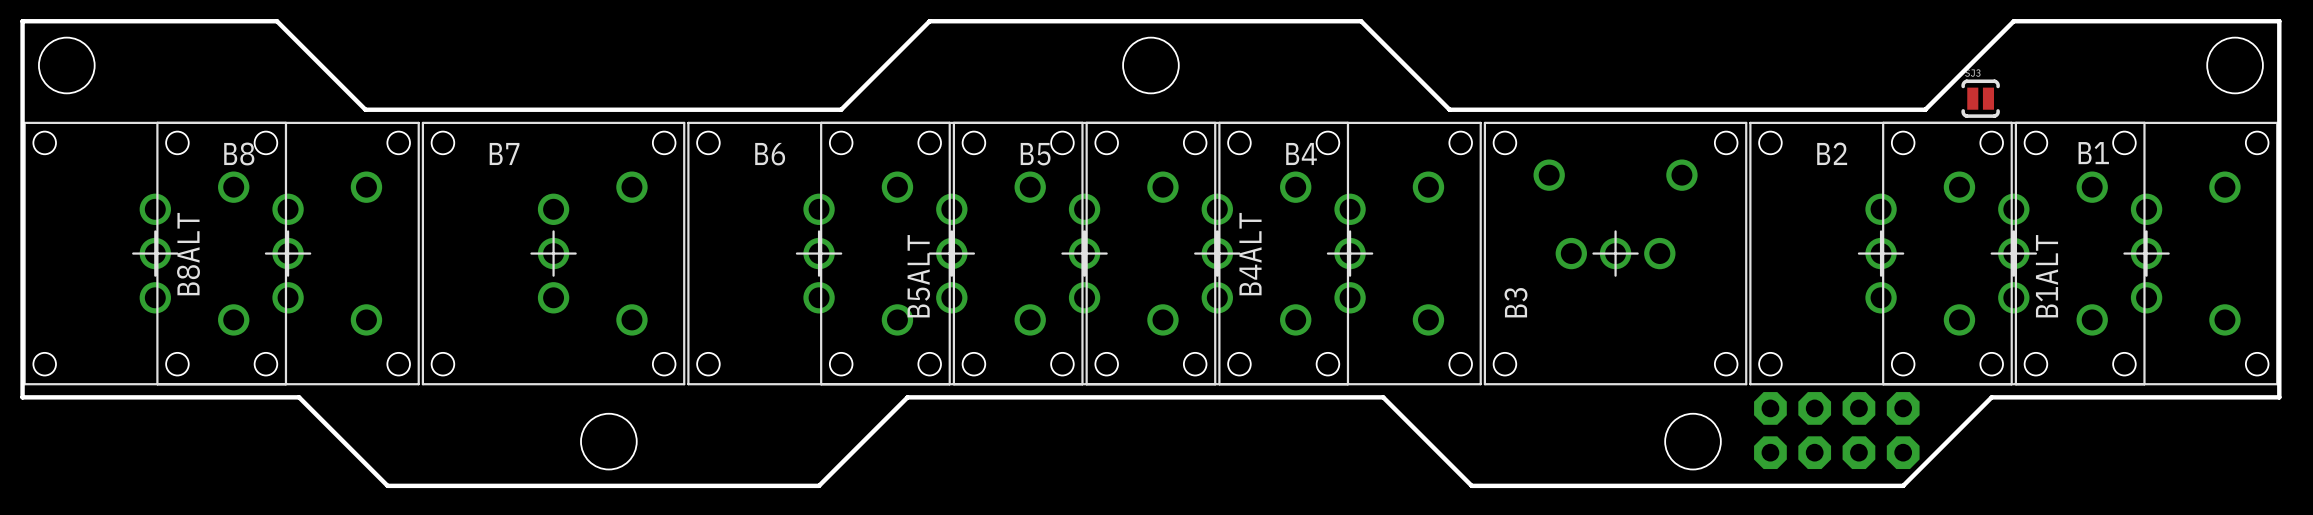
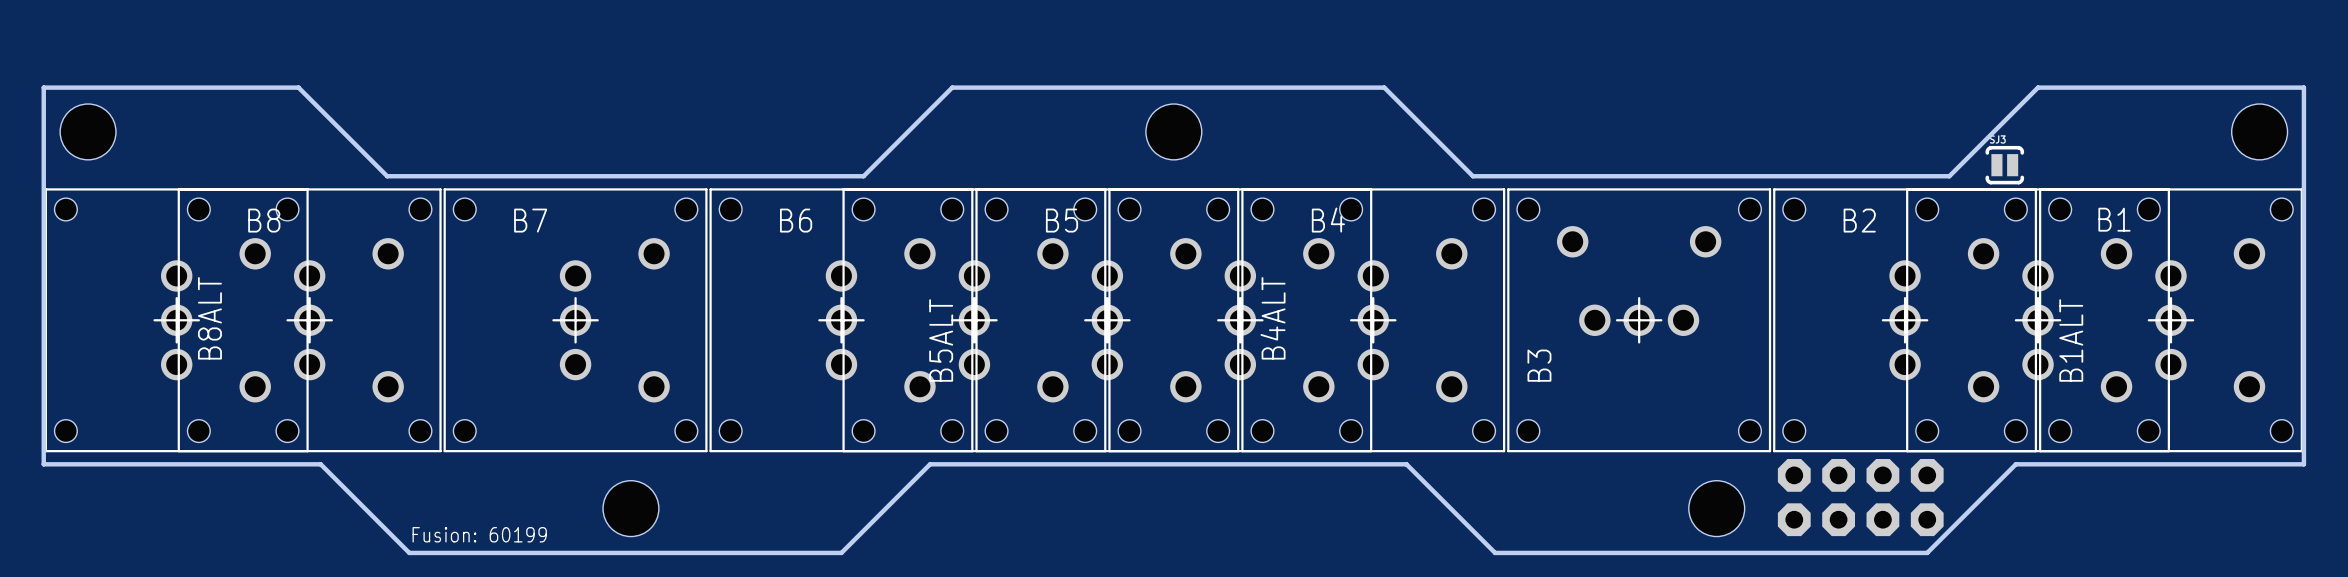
text: none -> Fusion: 60199 (479, 534)

